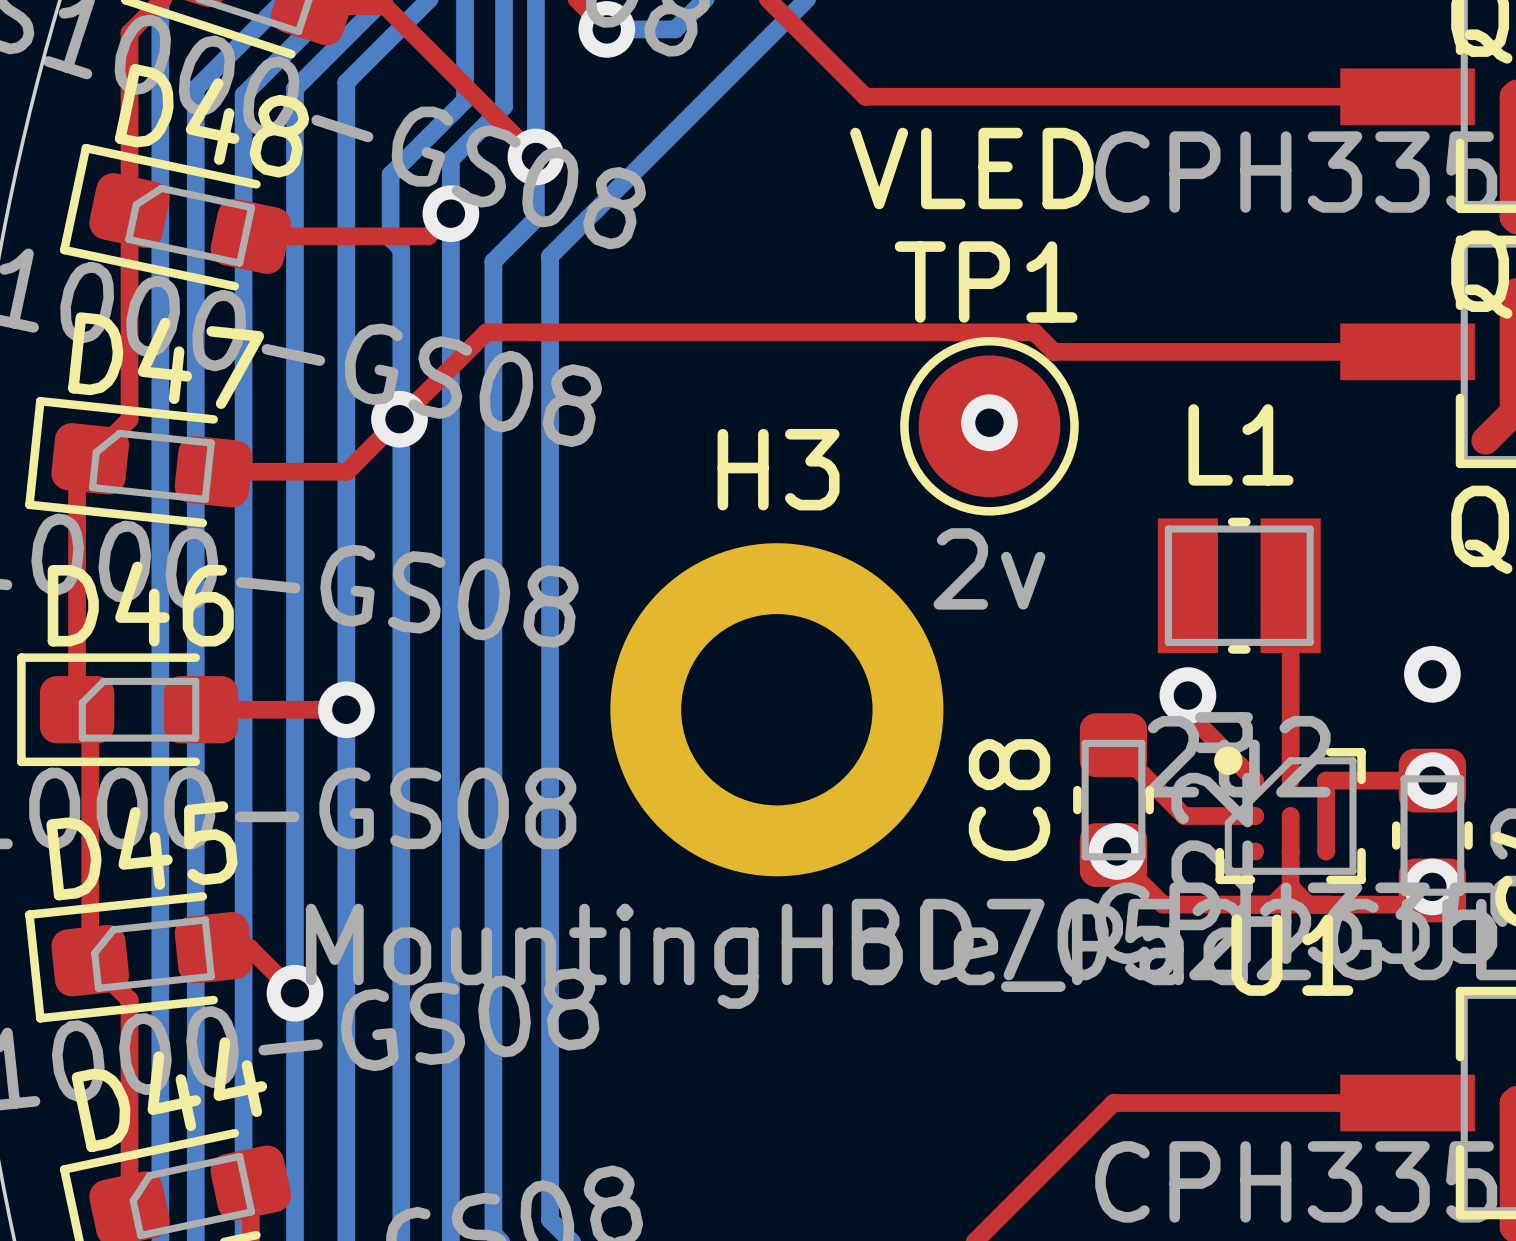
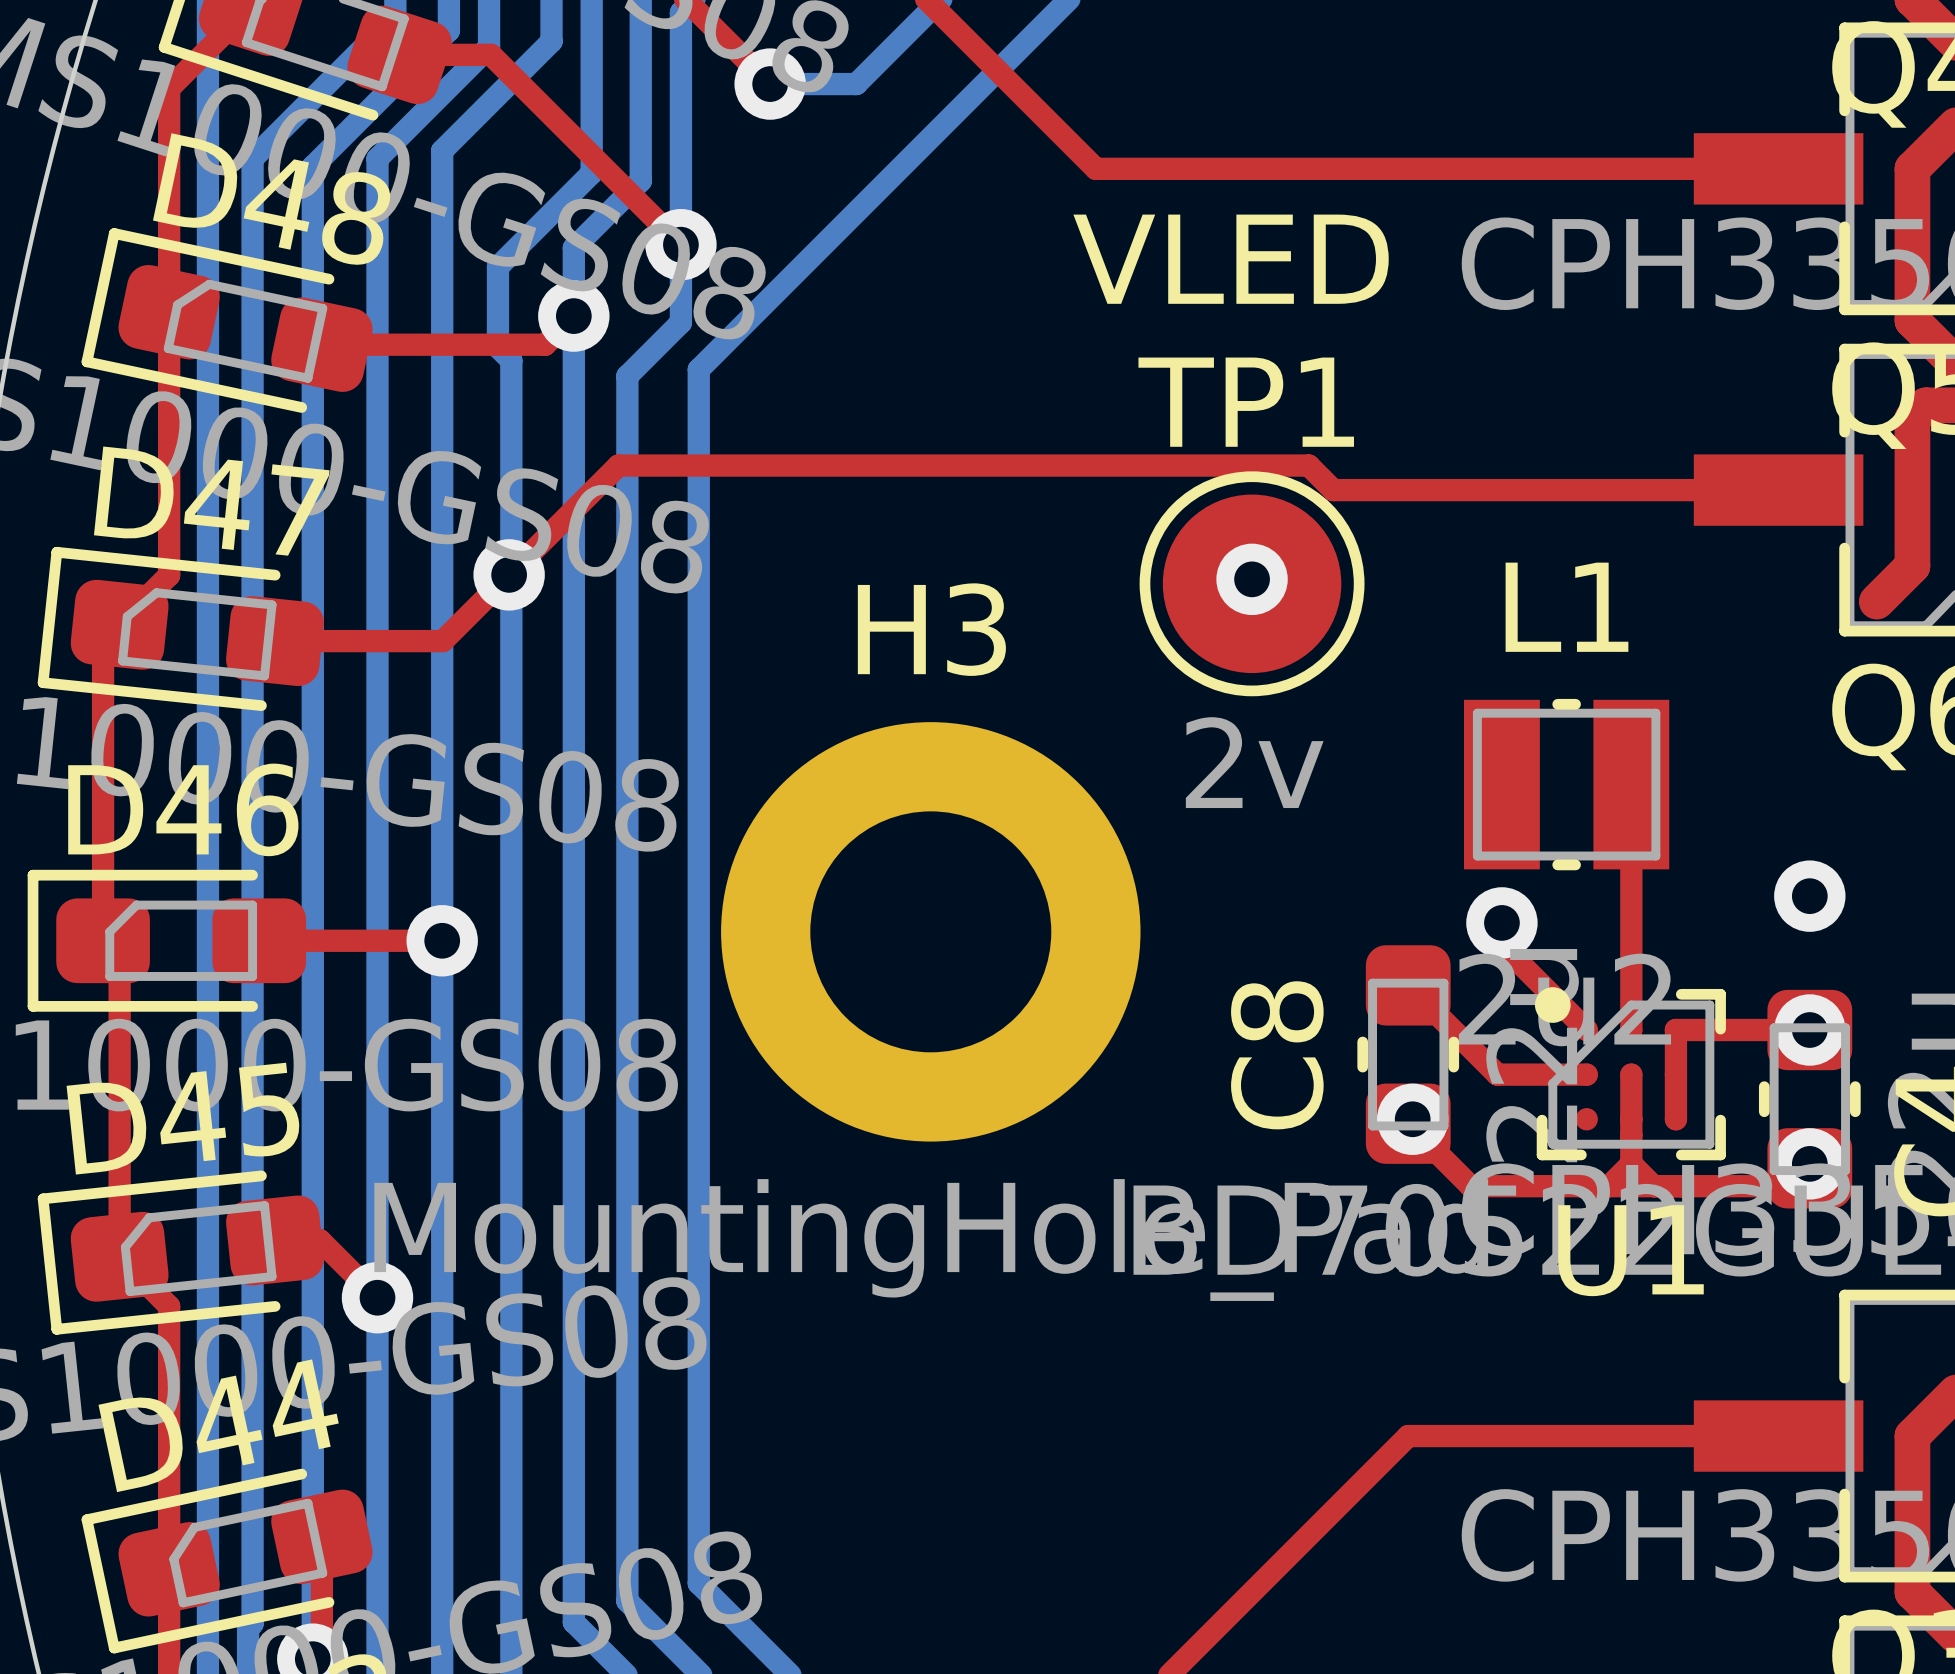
H3 position: (776, 709) -> (930, 931)

